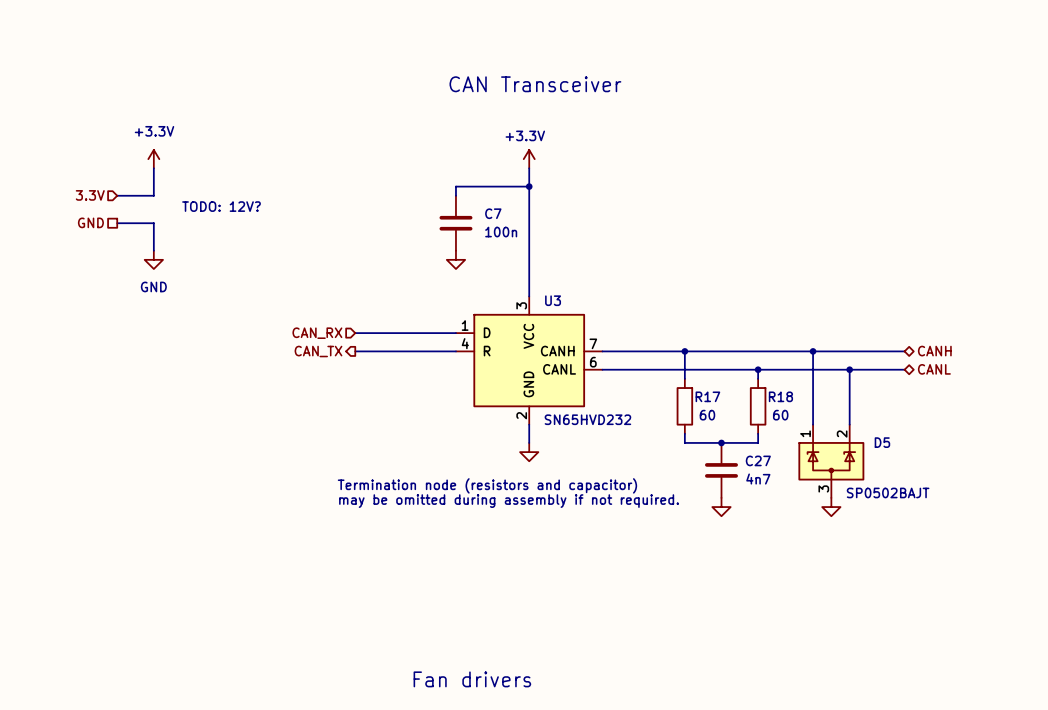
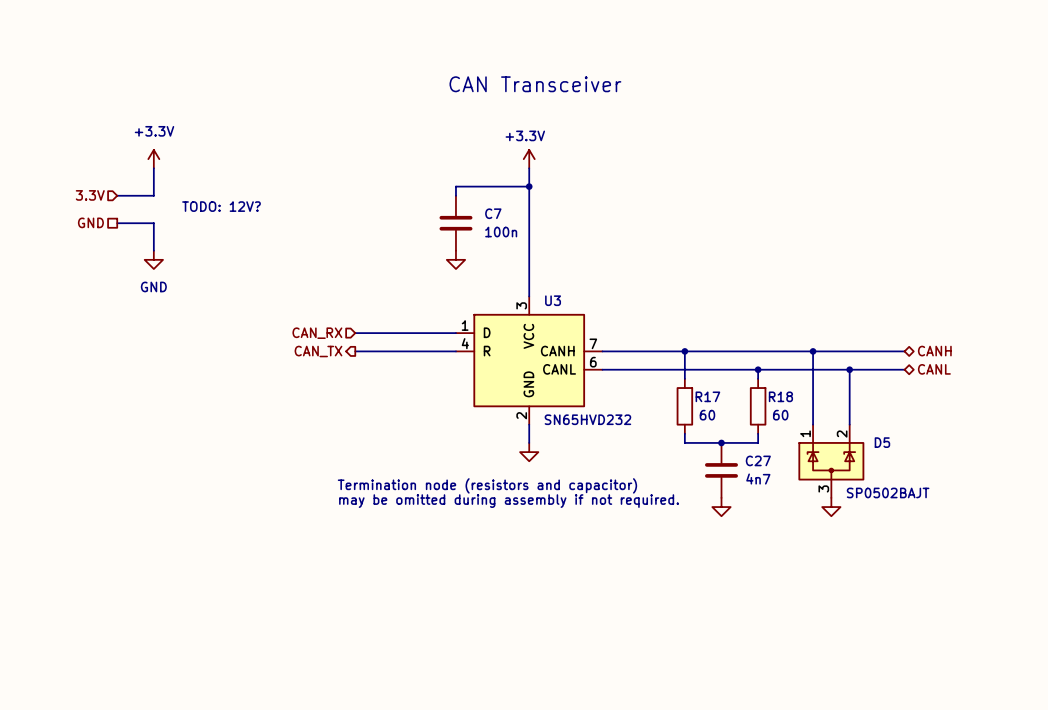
text: Fan drivers (472, 679) -> none

